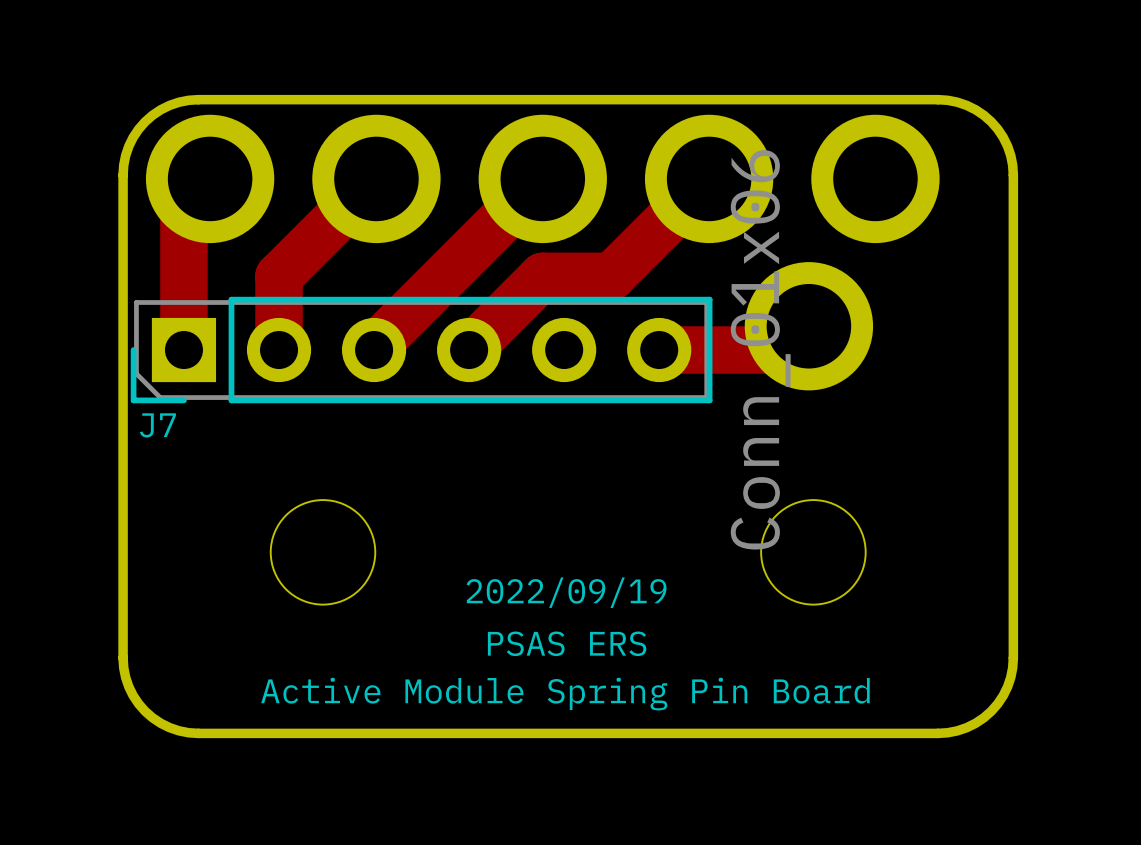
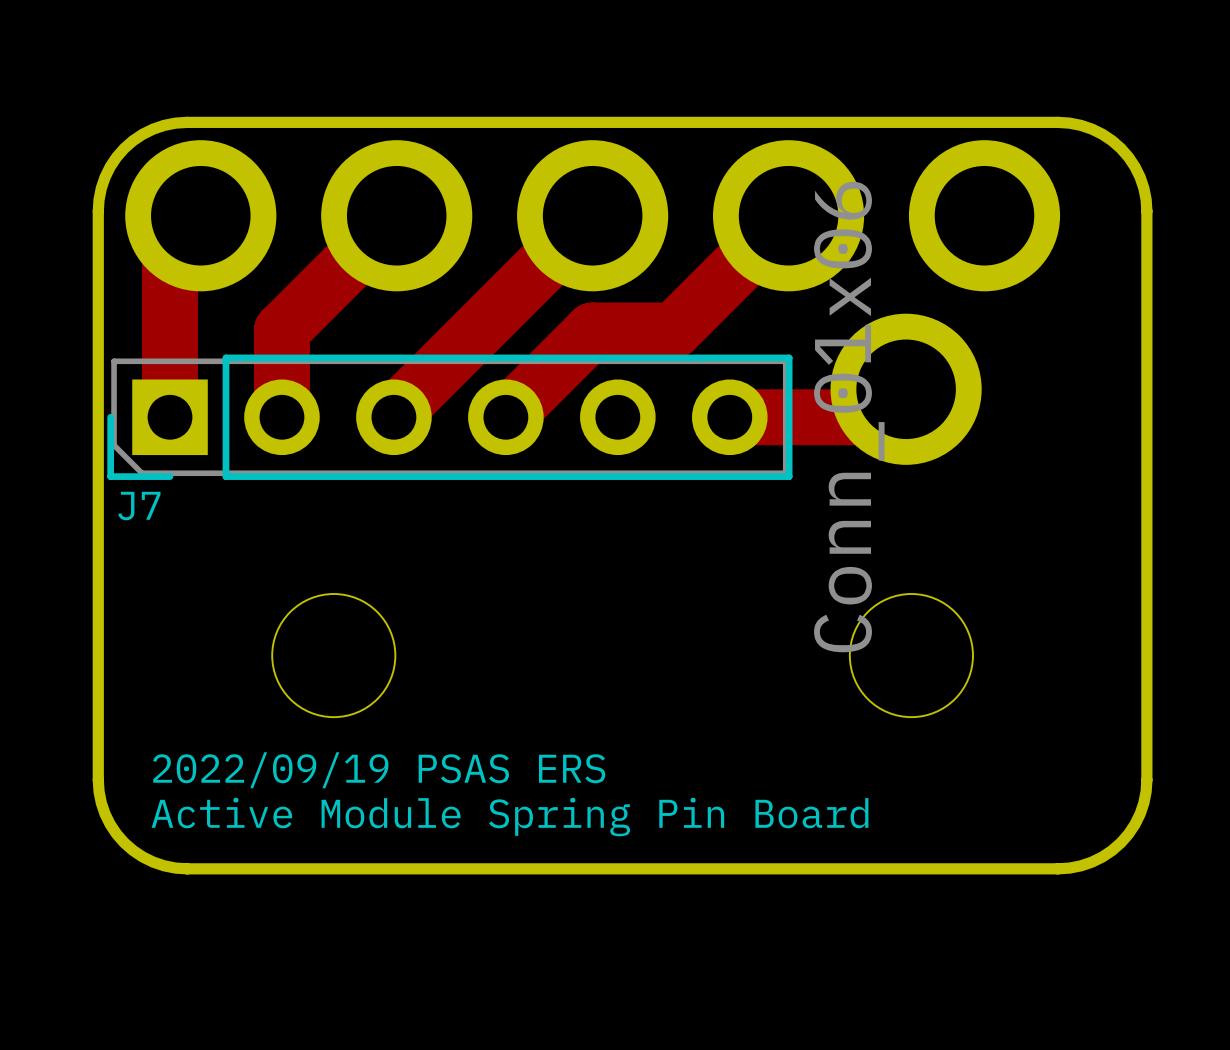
text: 2022/09/19 (566, 592) -> none
text: PSAS ERS (567, 643) -> none
text: none -> 2022/09/19 PSAS ERS (379, 770)
text position: Active Module Spring Pin Board (565, 694) -> Active Module Spring Pin Board (510, 817)

